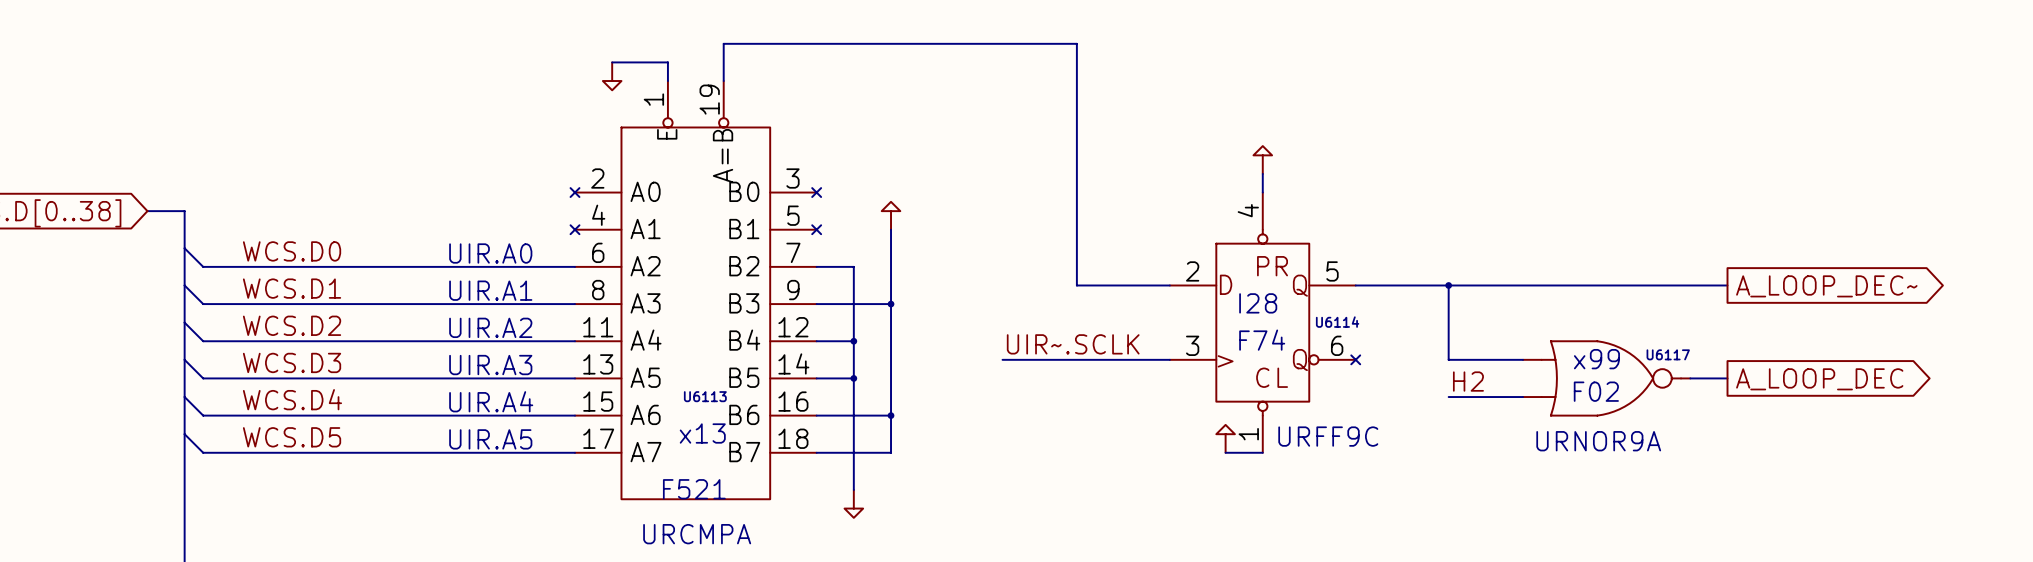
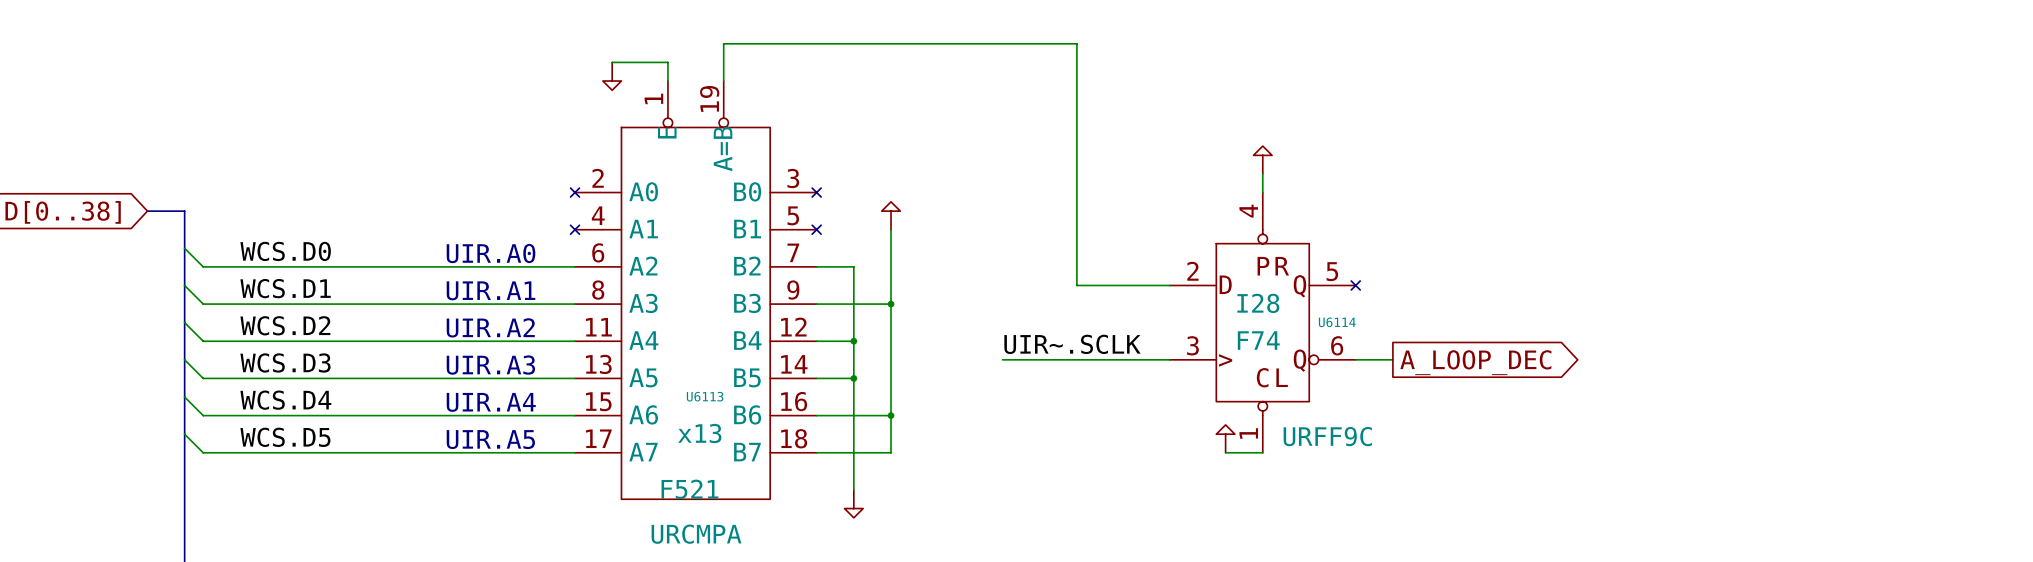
wire: (1355, 285) (1727, 285) -> none
no-connect mark: none -> (1355, 285)
wire: (1448, 285) (1448, 359) (1523, 359) -> none
junction: (1448, 285) -> none
global label: A_LOOP_DEC~ (1826, 286) -> none
wire: none -> (1355, 359) (1392, 359)
no-connect mark: (1355, 359) -> none
global label: none -> A_LOOP_DEC (1475, 362)
U6117: F02 (1606, 378) -> none
wire: (1690, 378) (1727, 378) -> none
global label: A_LOOP_DEC (1819, 379) -> none
label: H2 (1468, 381) -> none
wire: (1448, 397) (1523, 397) -> none

